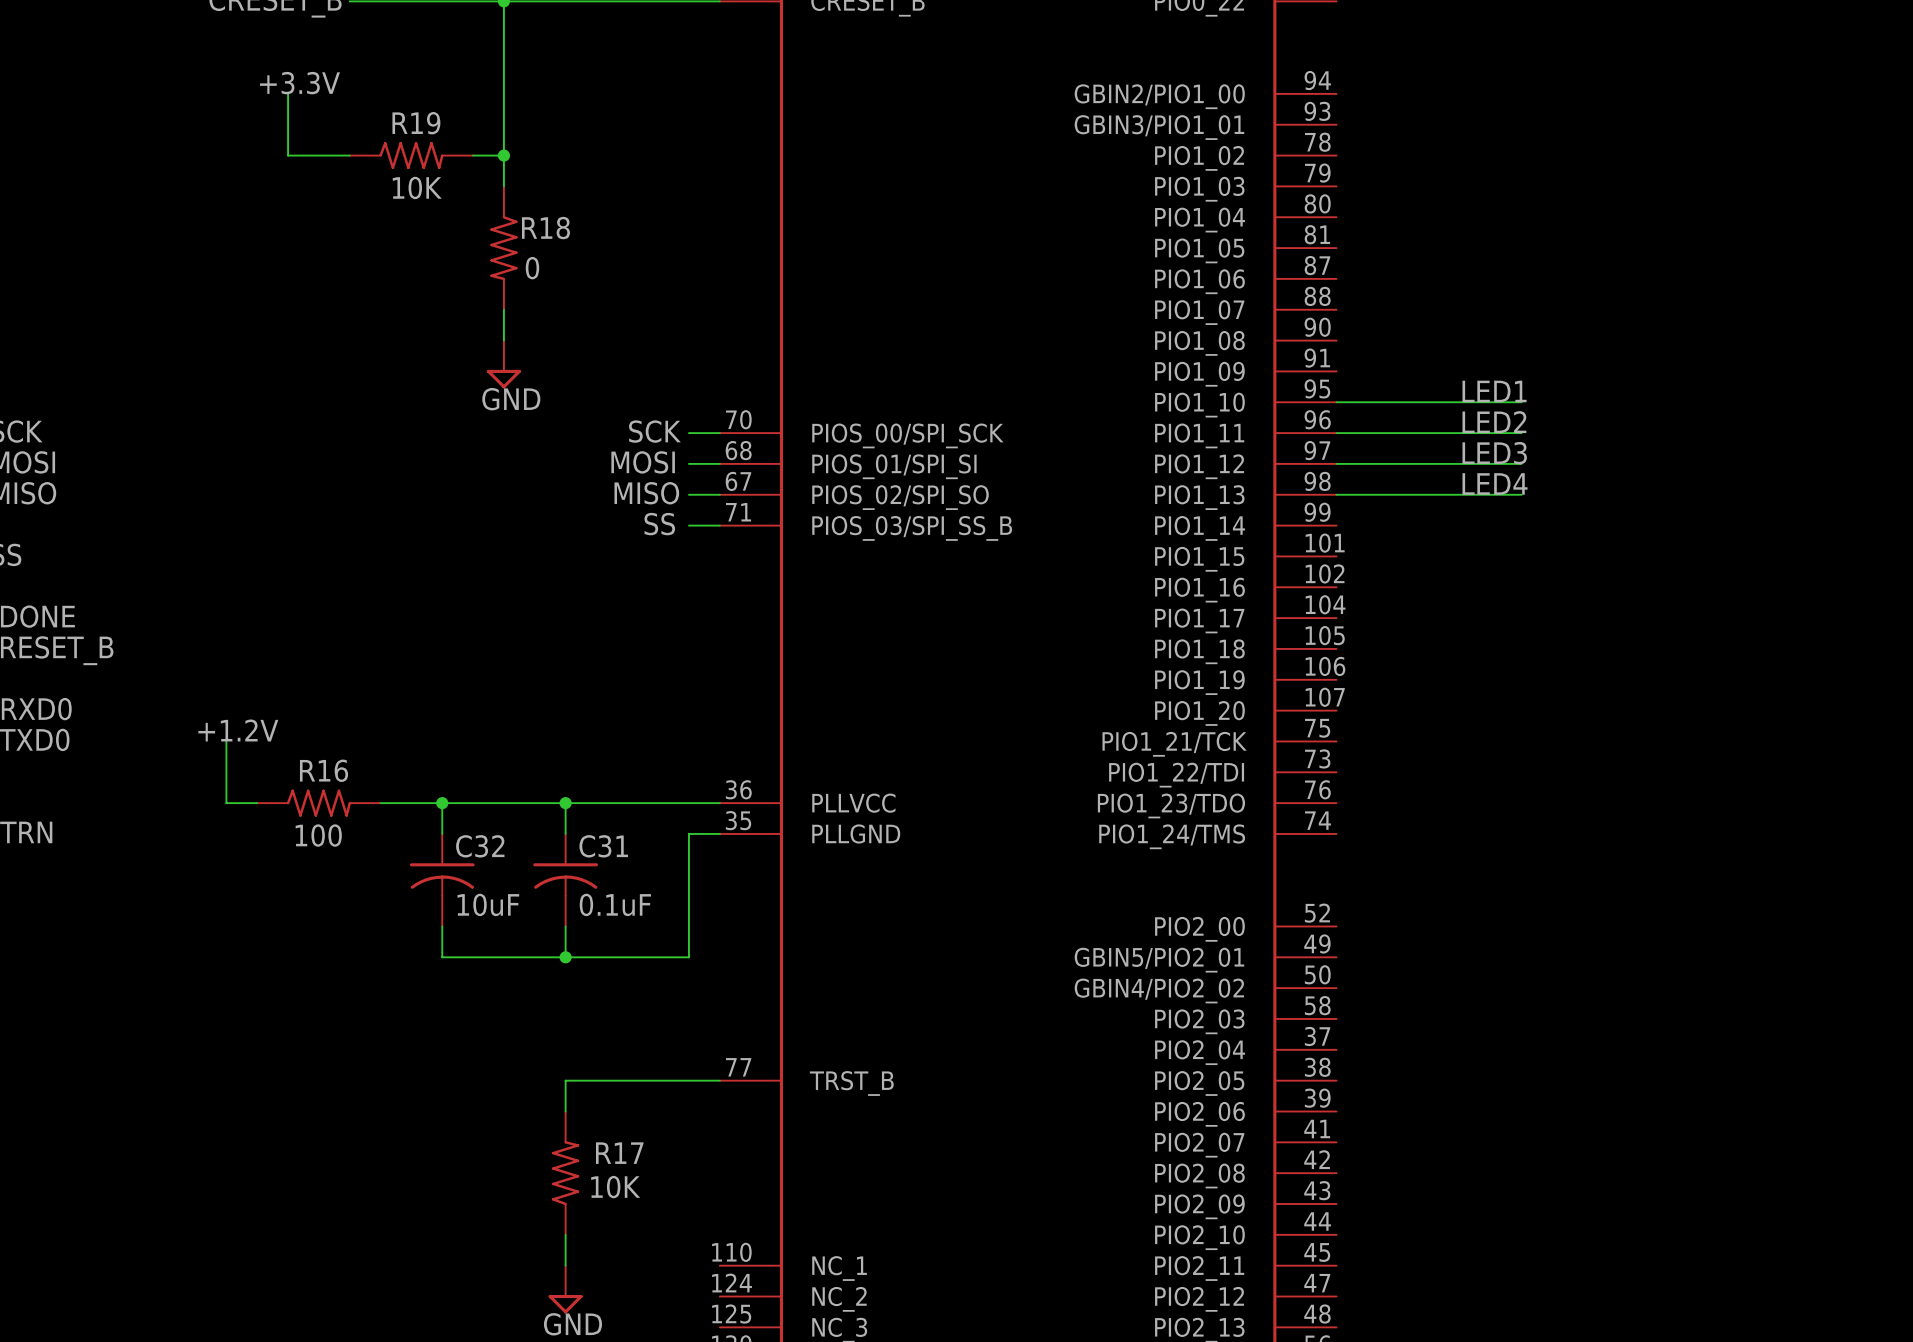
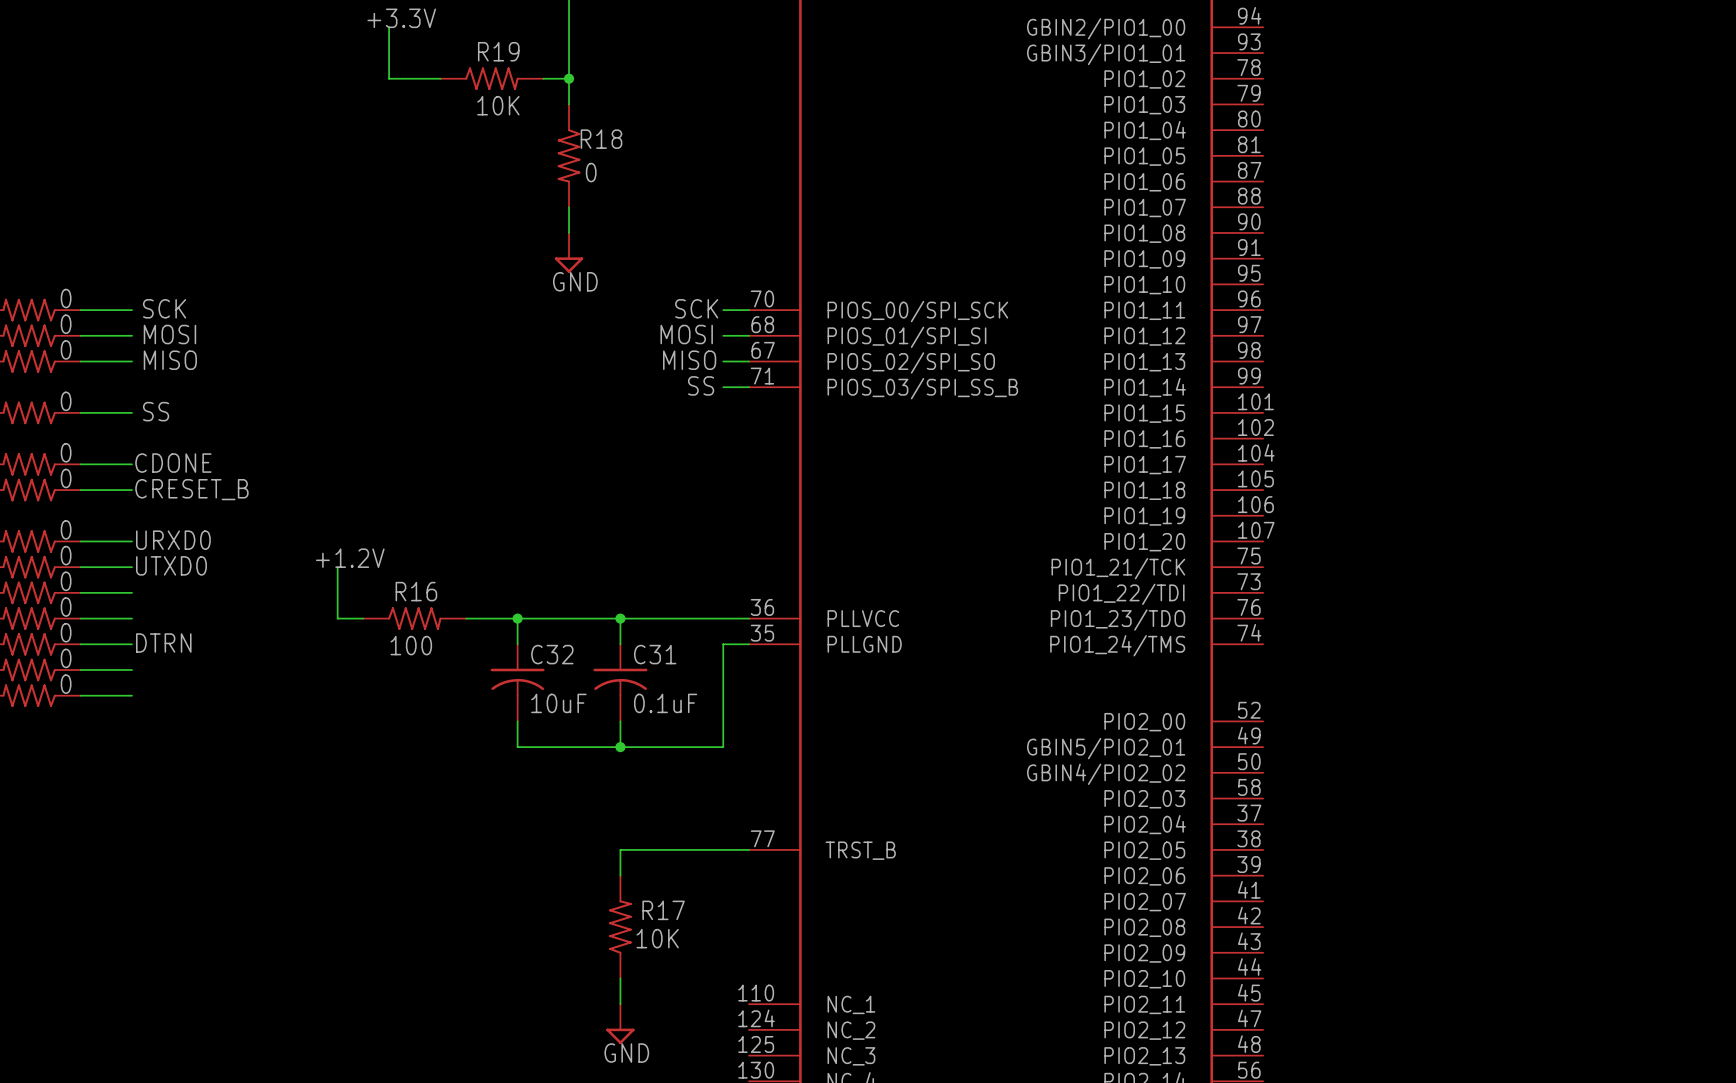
label: LED1 (1494, 391) -> none
wire: (1336, 402) (1521, 402) -> none
label: LED2 (1494, 422) -> none
wire: (1336, 433) (1521, 433) -> none
label: LED3 (1494, 453) -> none
wire: (1336, 463) (1521, 463) -> none
label: LED4 (1495, 483) -> none
wire: (1336, 494) (1521, 494) -> none

